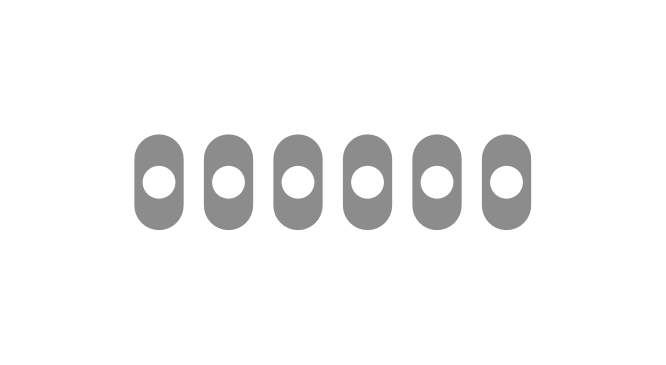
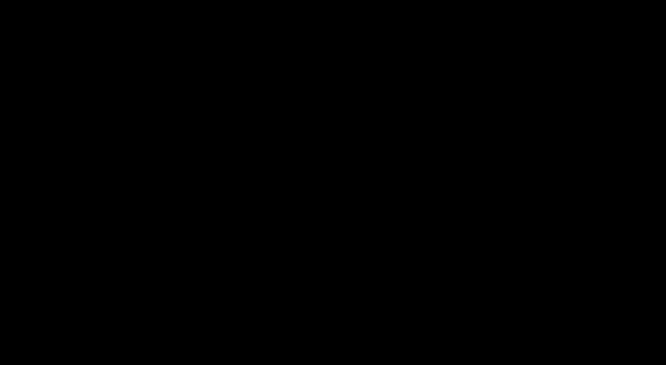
part: (332, 182) -> none

